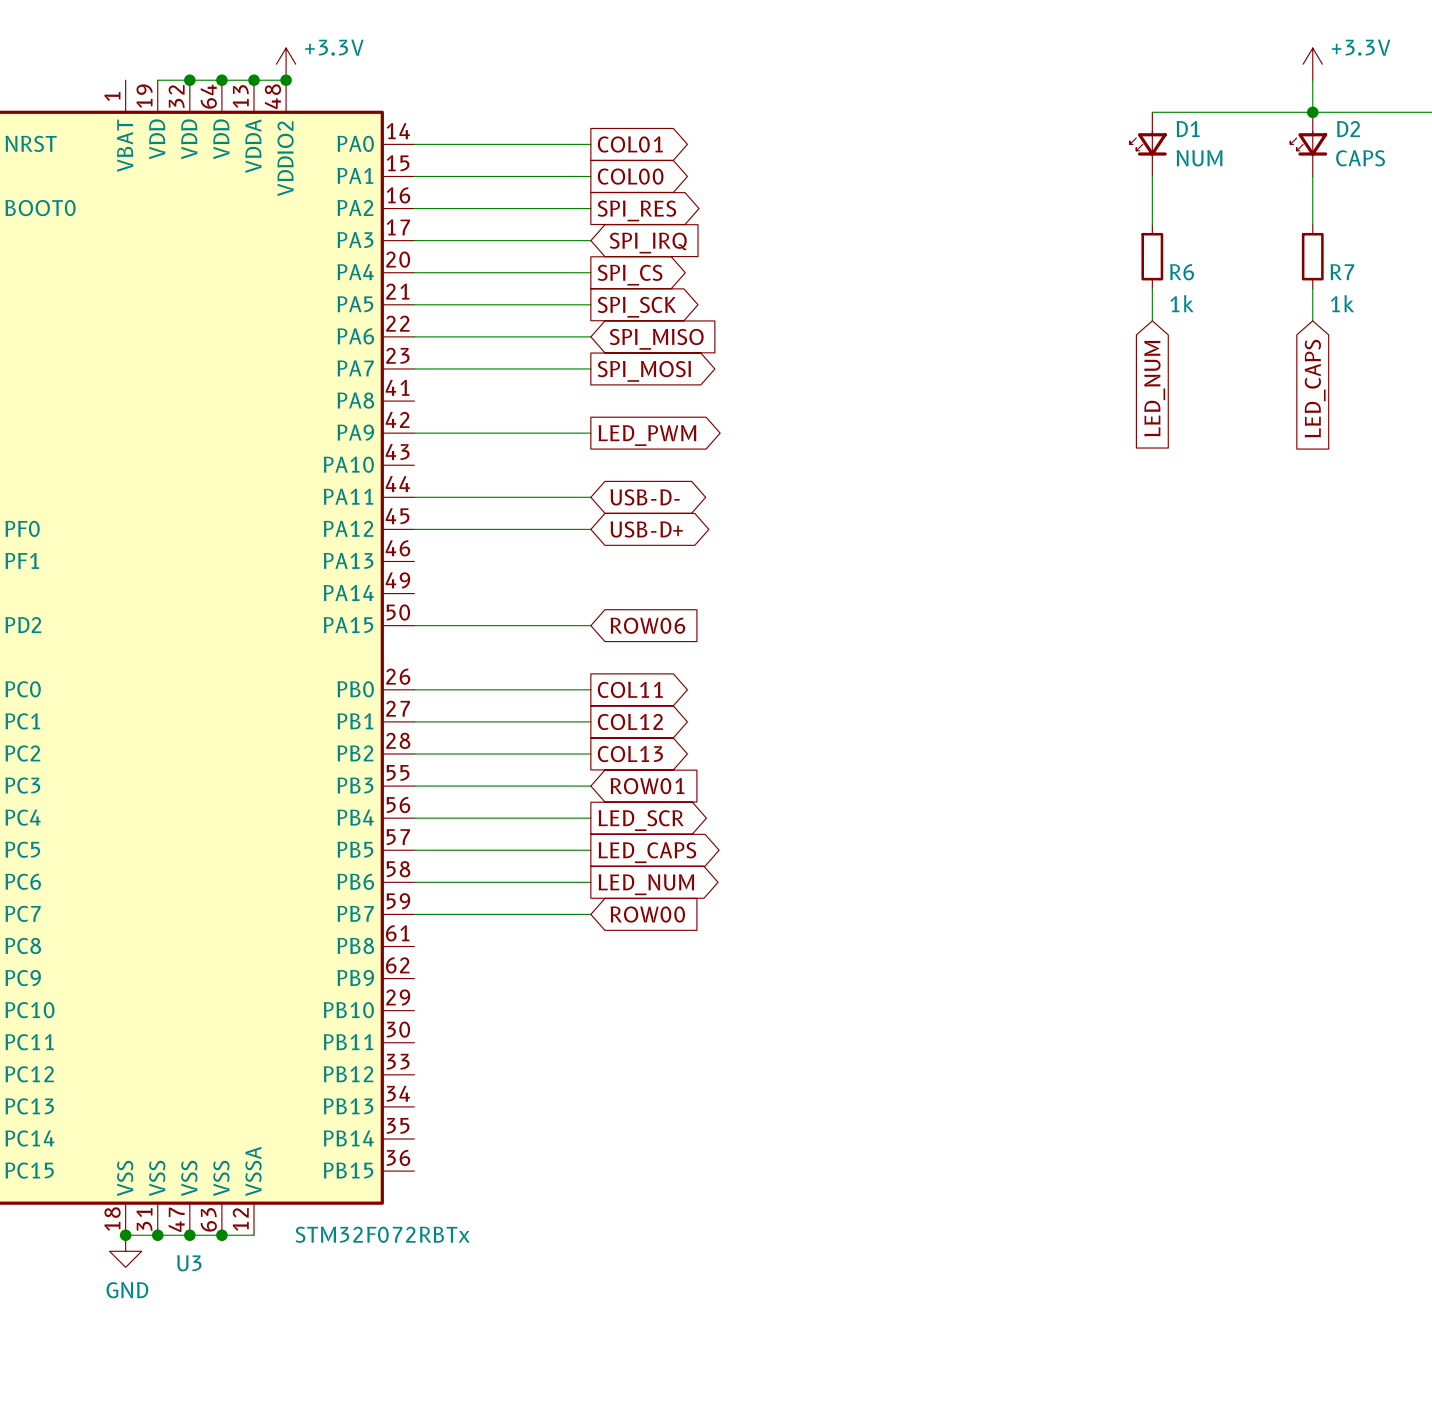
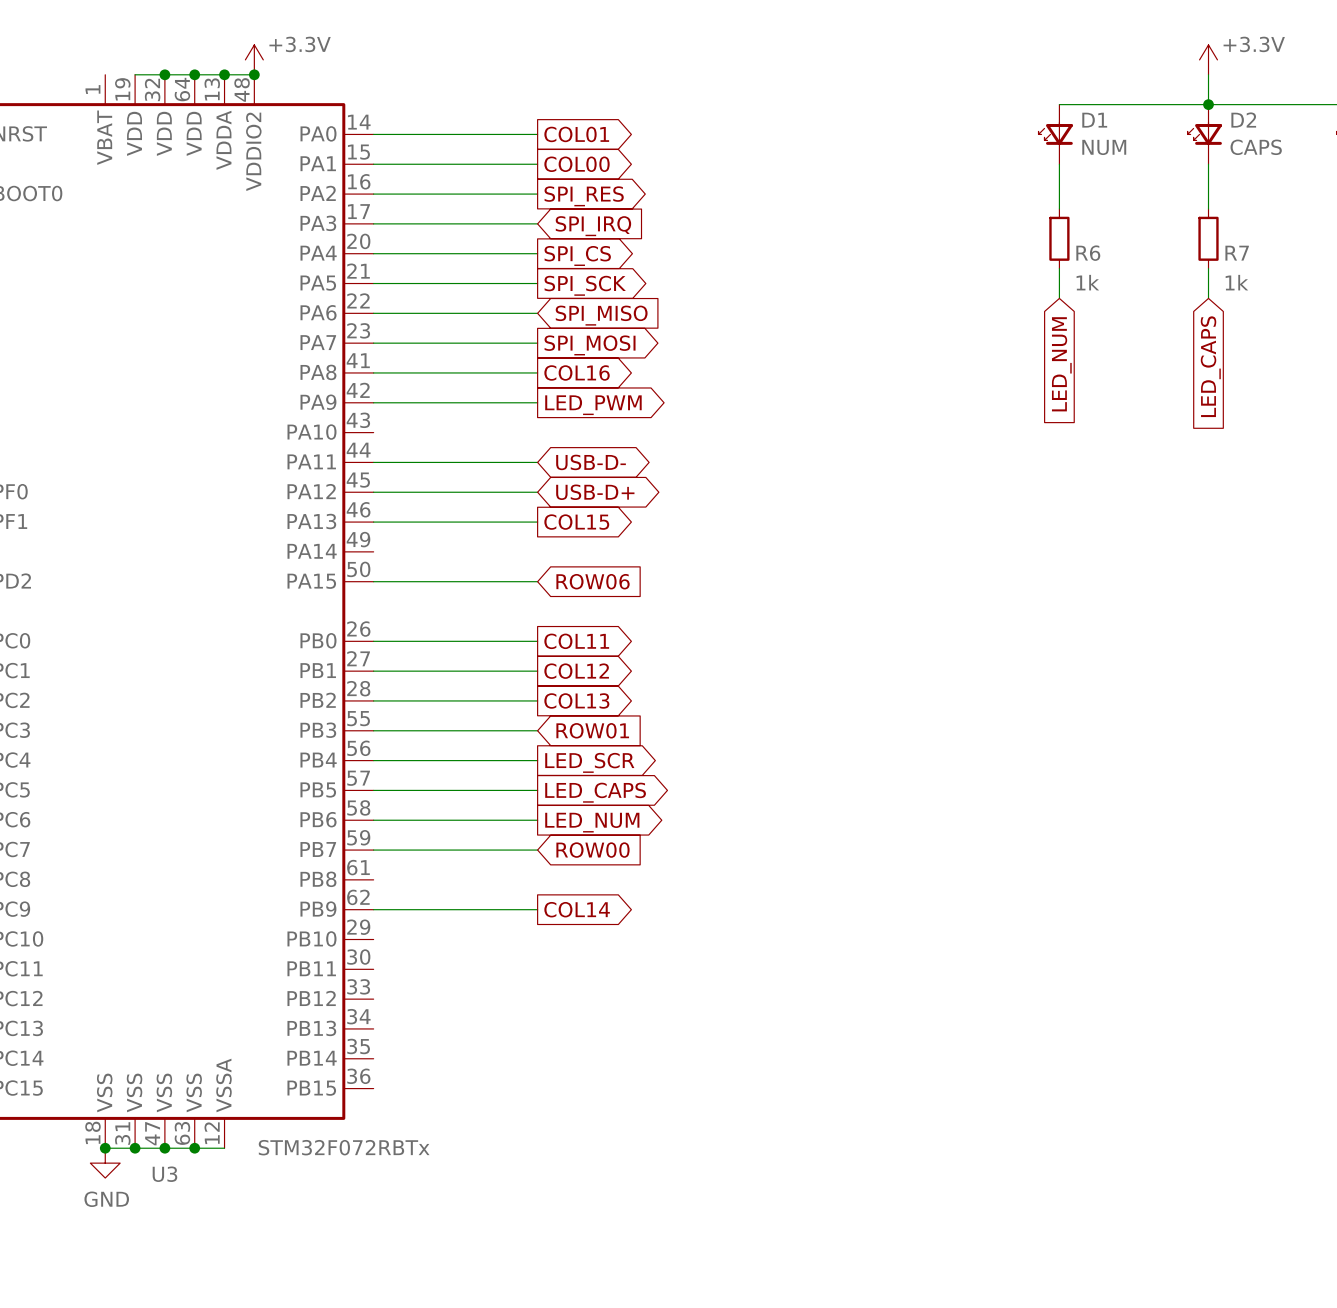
wire: none -> (373, 372) (537, 372)
global label: none -> COL16 (577, 372)
wire: none -> (373, 522) (537, 522)
global label: none -> COL15 (576, 522)
wire: none -> (373, 909) (537, 909)
global label: none -> COL14 (577, 909)

